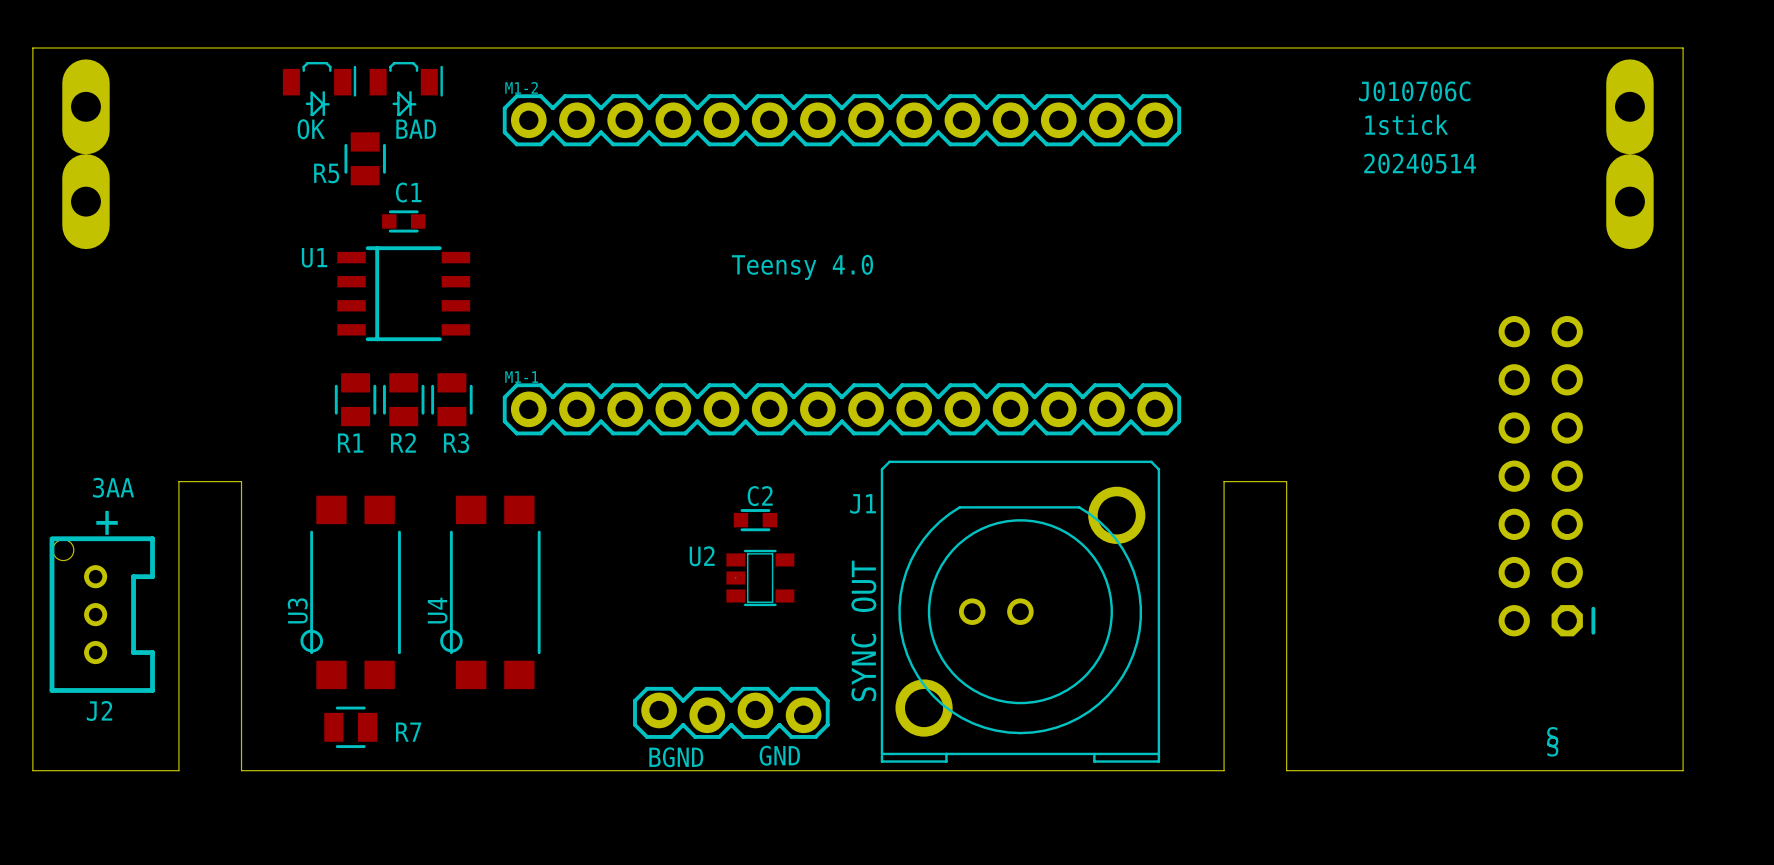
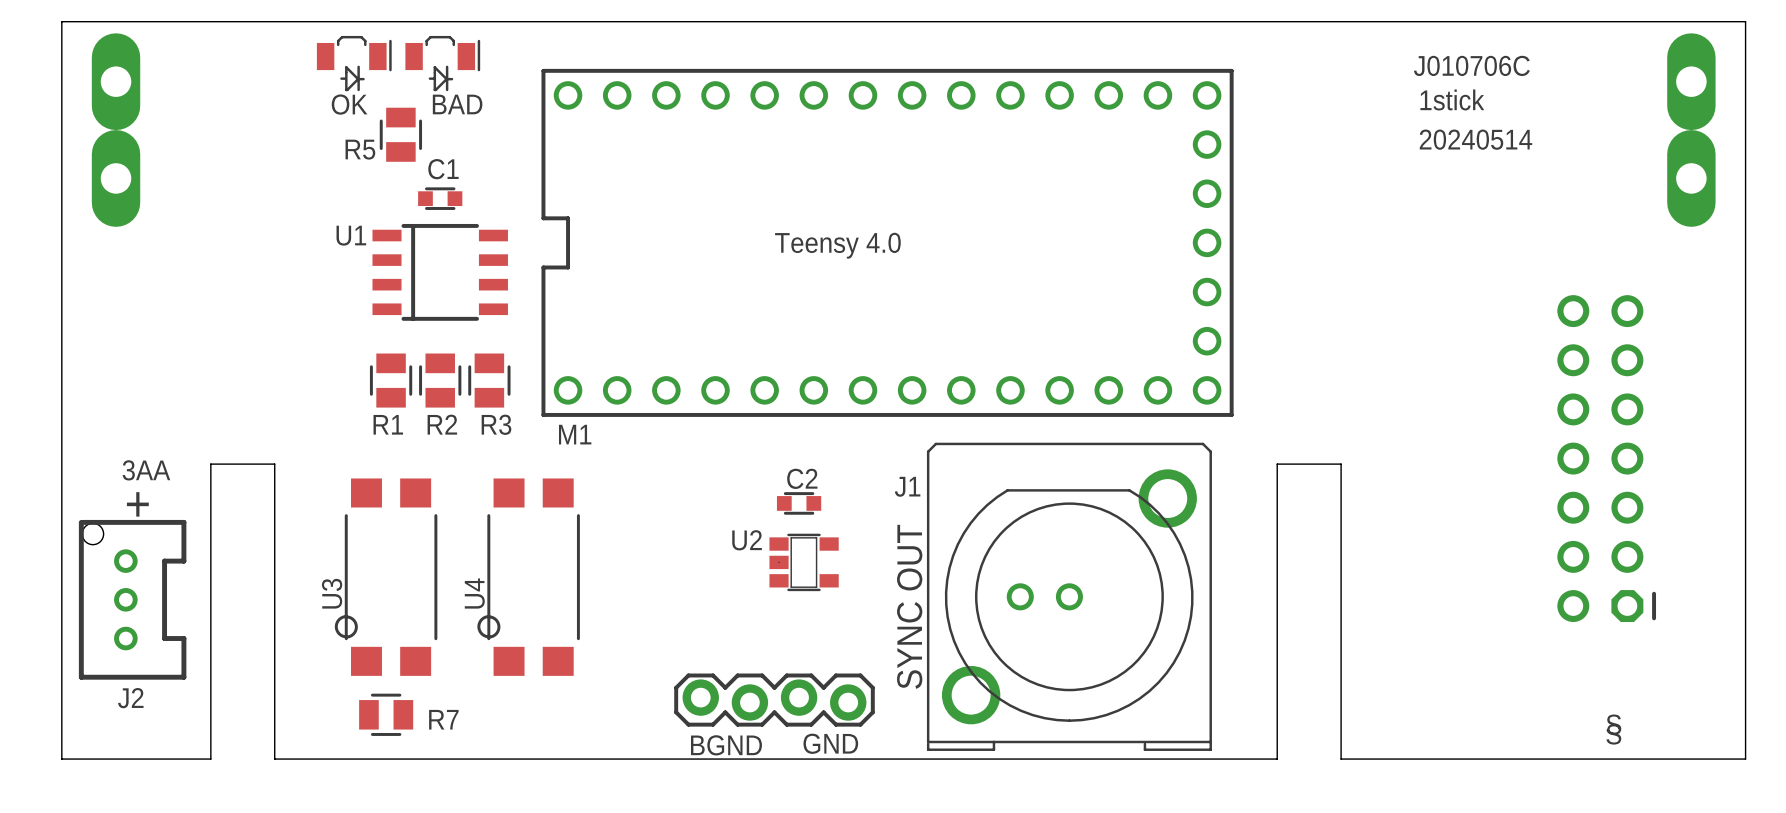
M1-2: (841, 120) -> none
M1: none -> (887, 242)
M1-1: (841, 409) -> none

